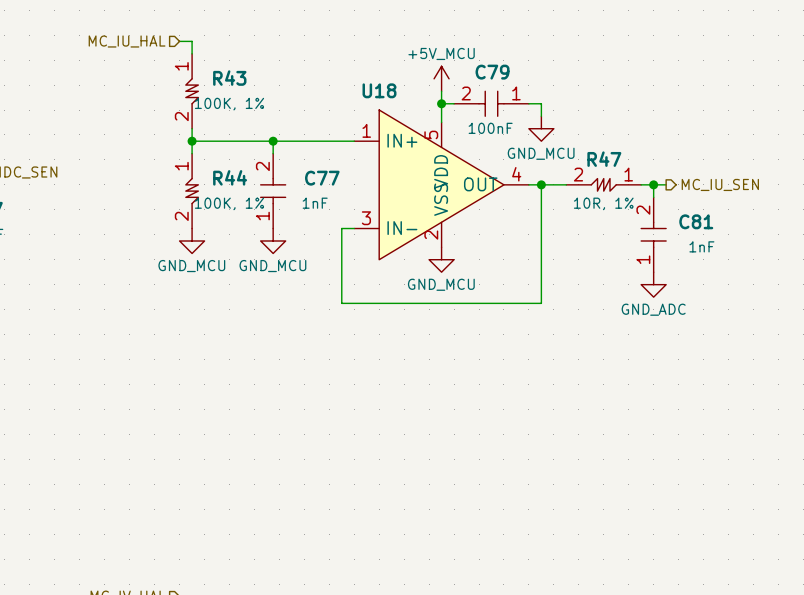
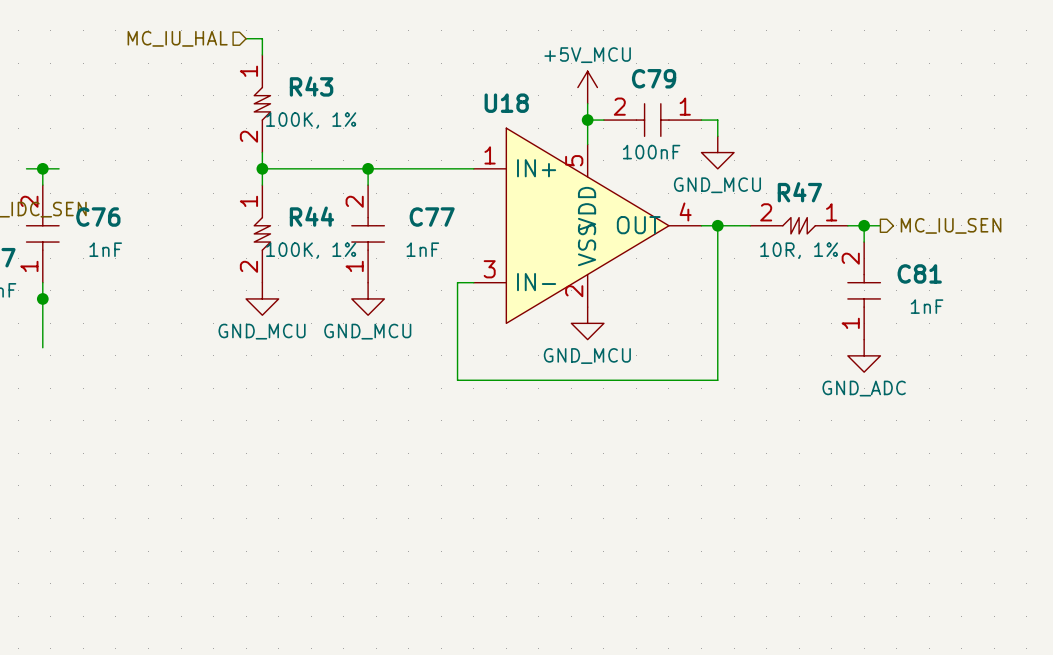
wire: none -> (26, 168) (59, 168)
wire: none -> (42, 168) (42, 185)
junction: none -> (42, 168)
C76: none -> 1nF (42, 233)
wire: none -> (42, 282) (42, 347)
junction: none -> (42, 298)

